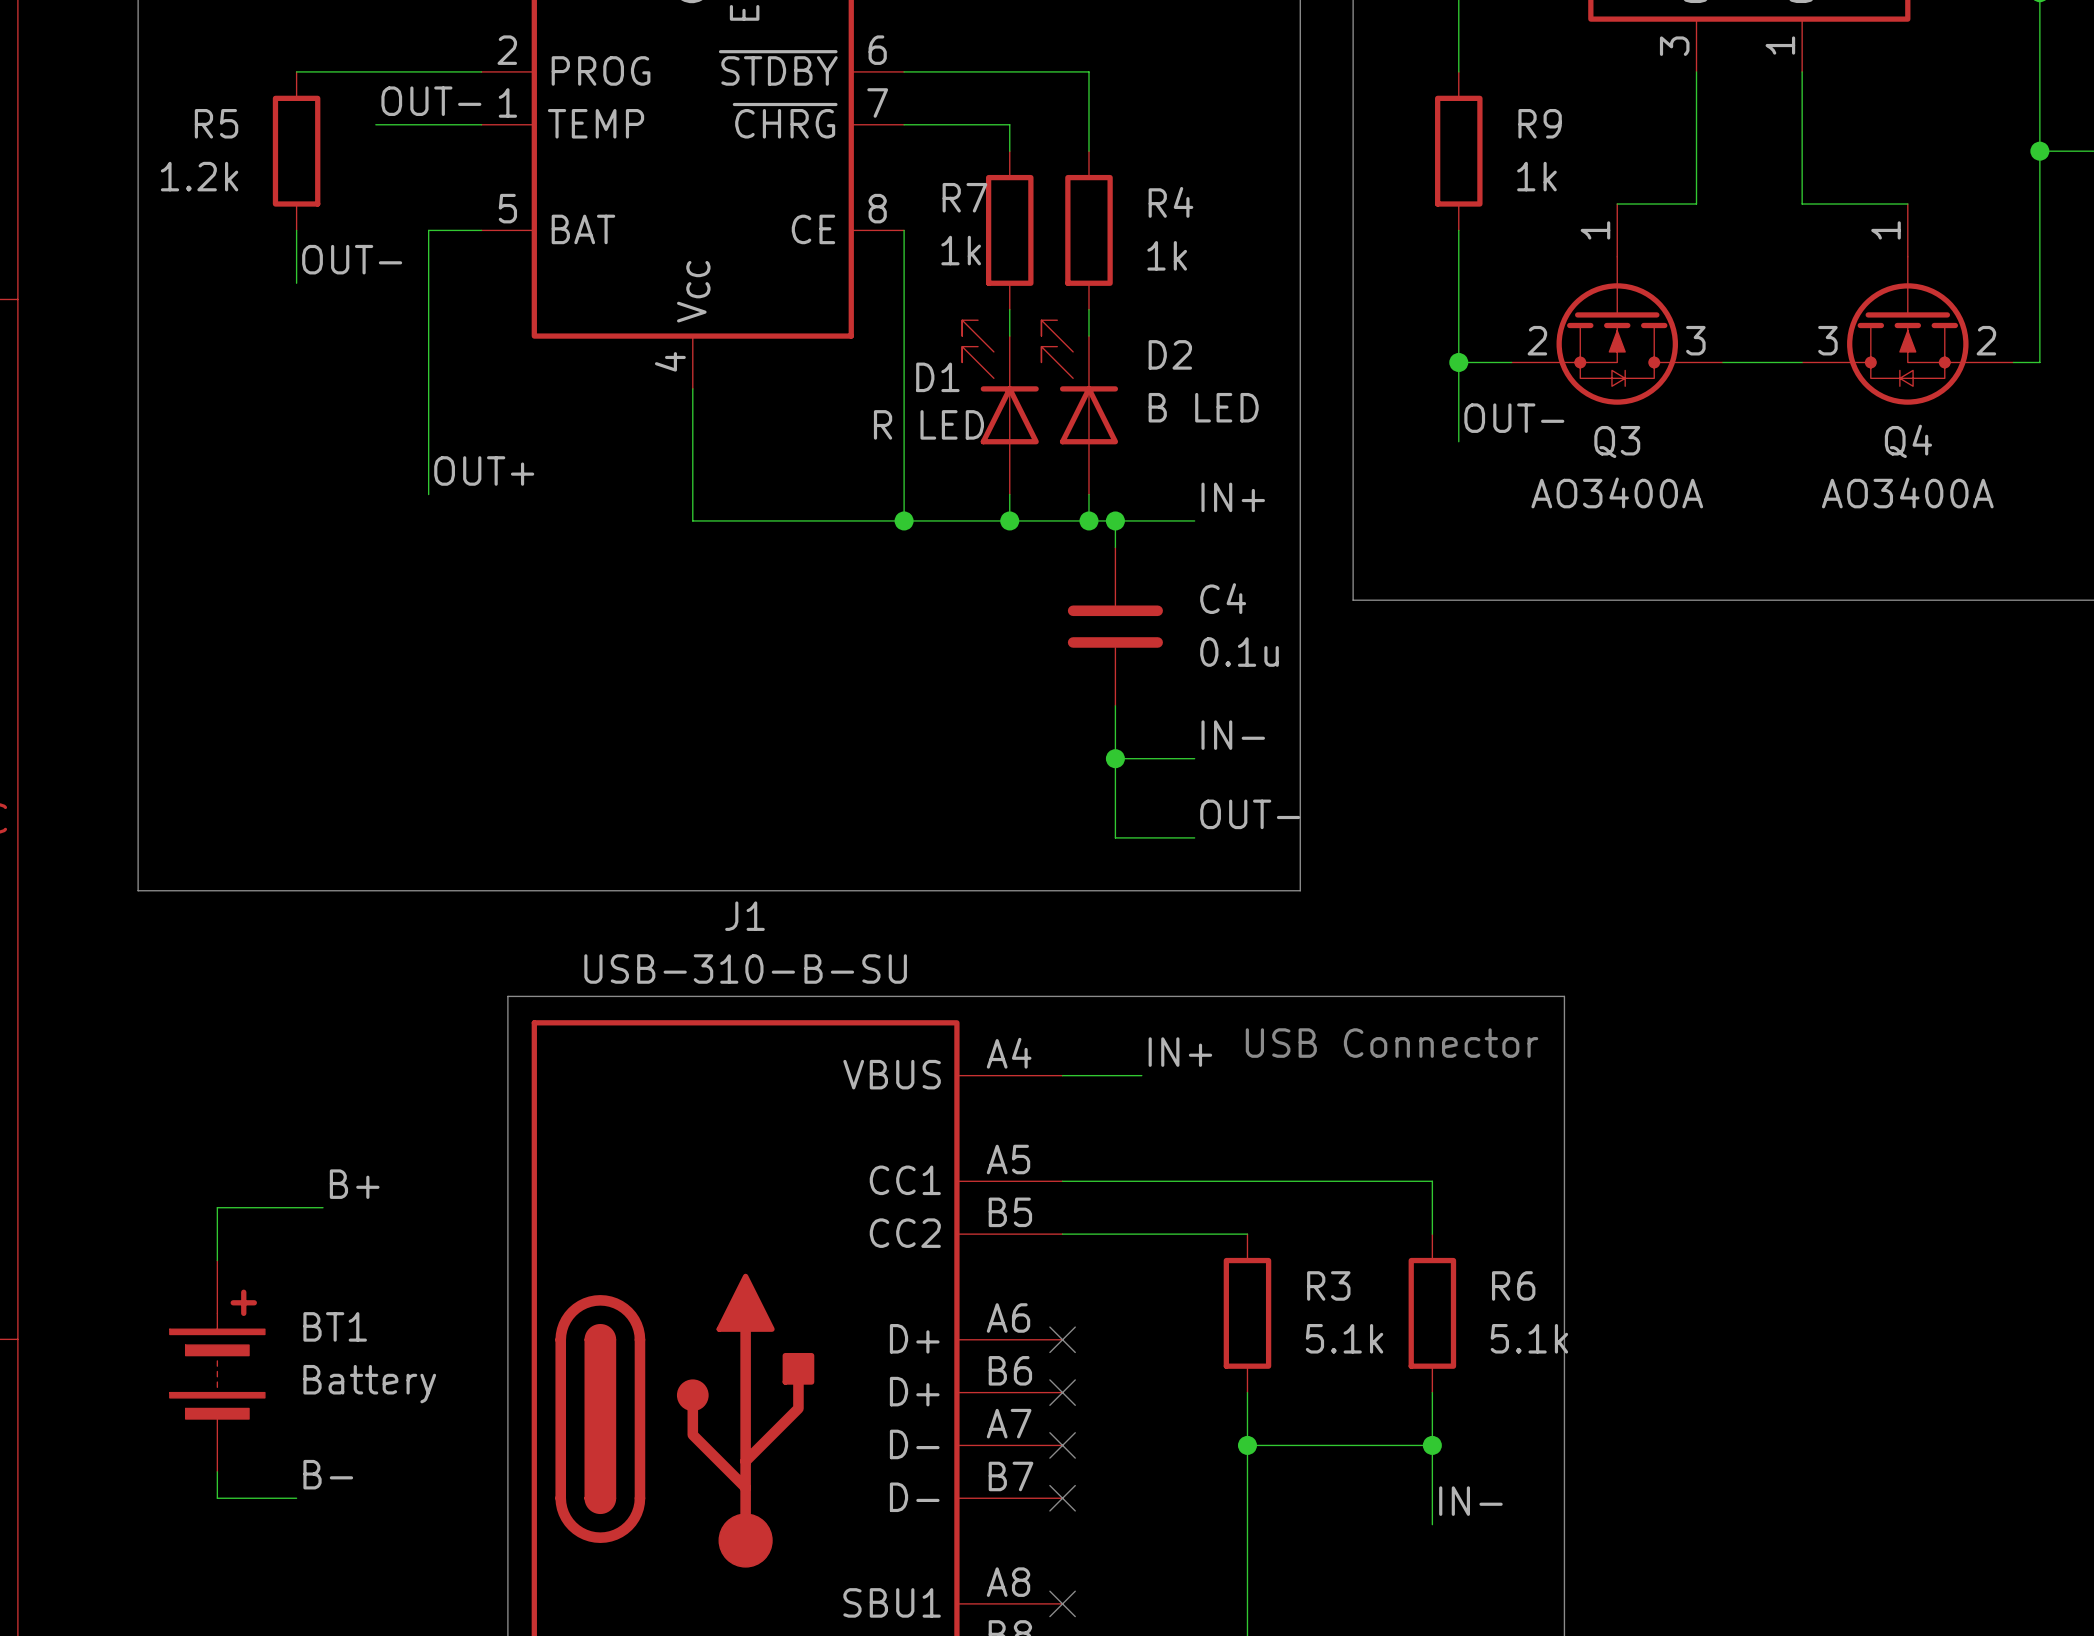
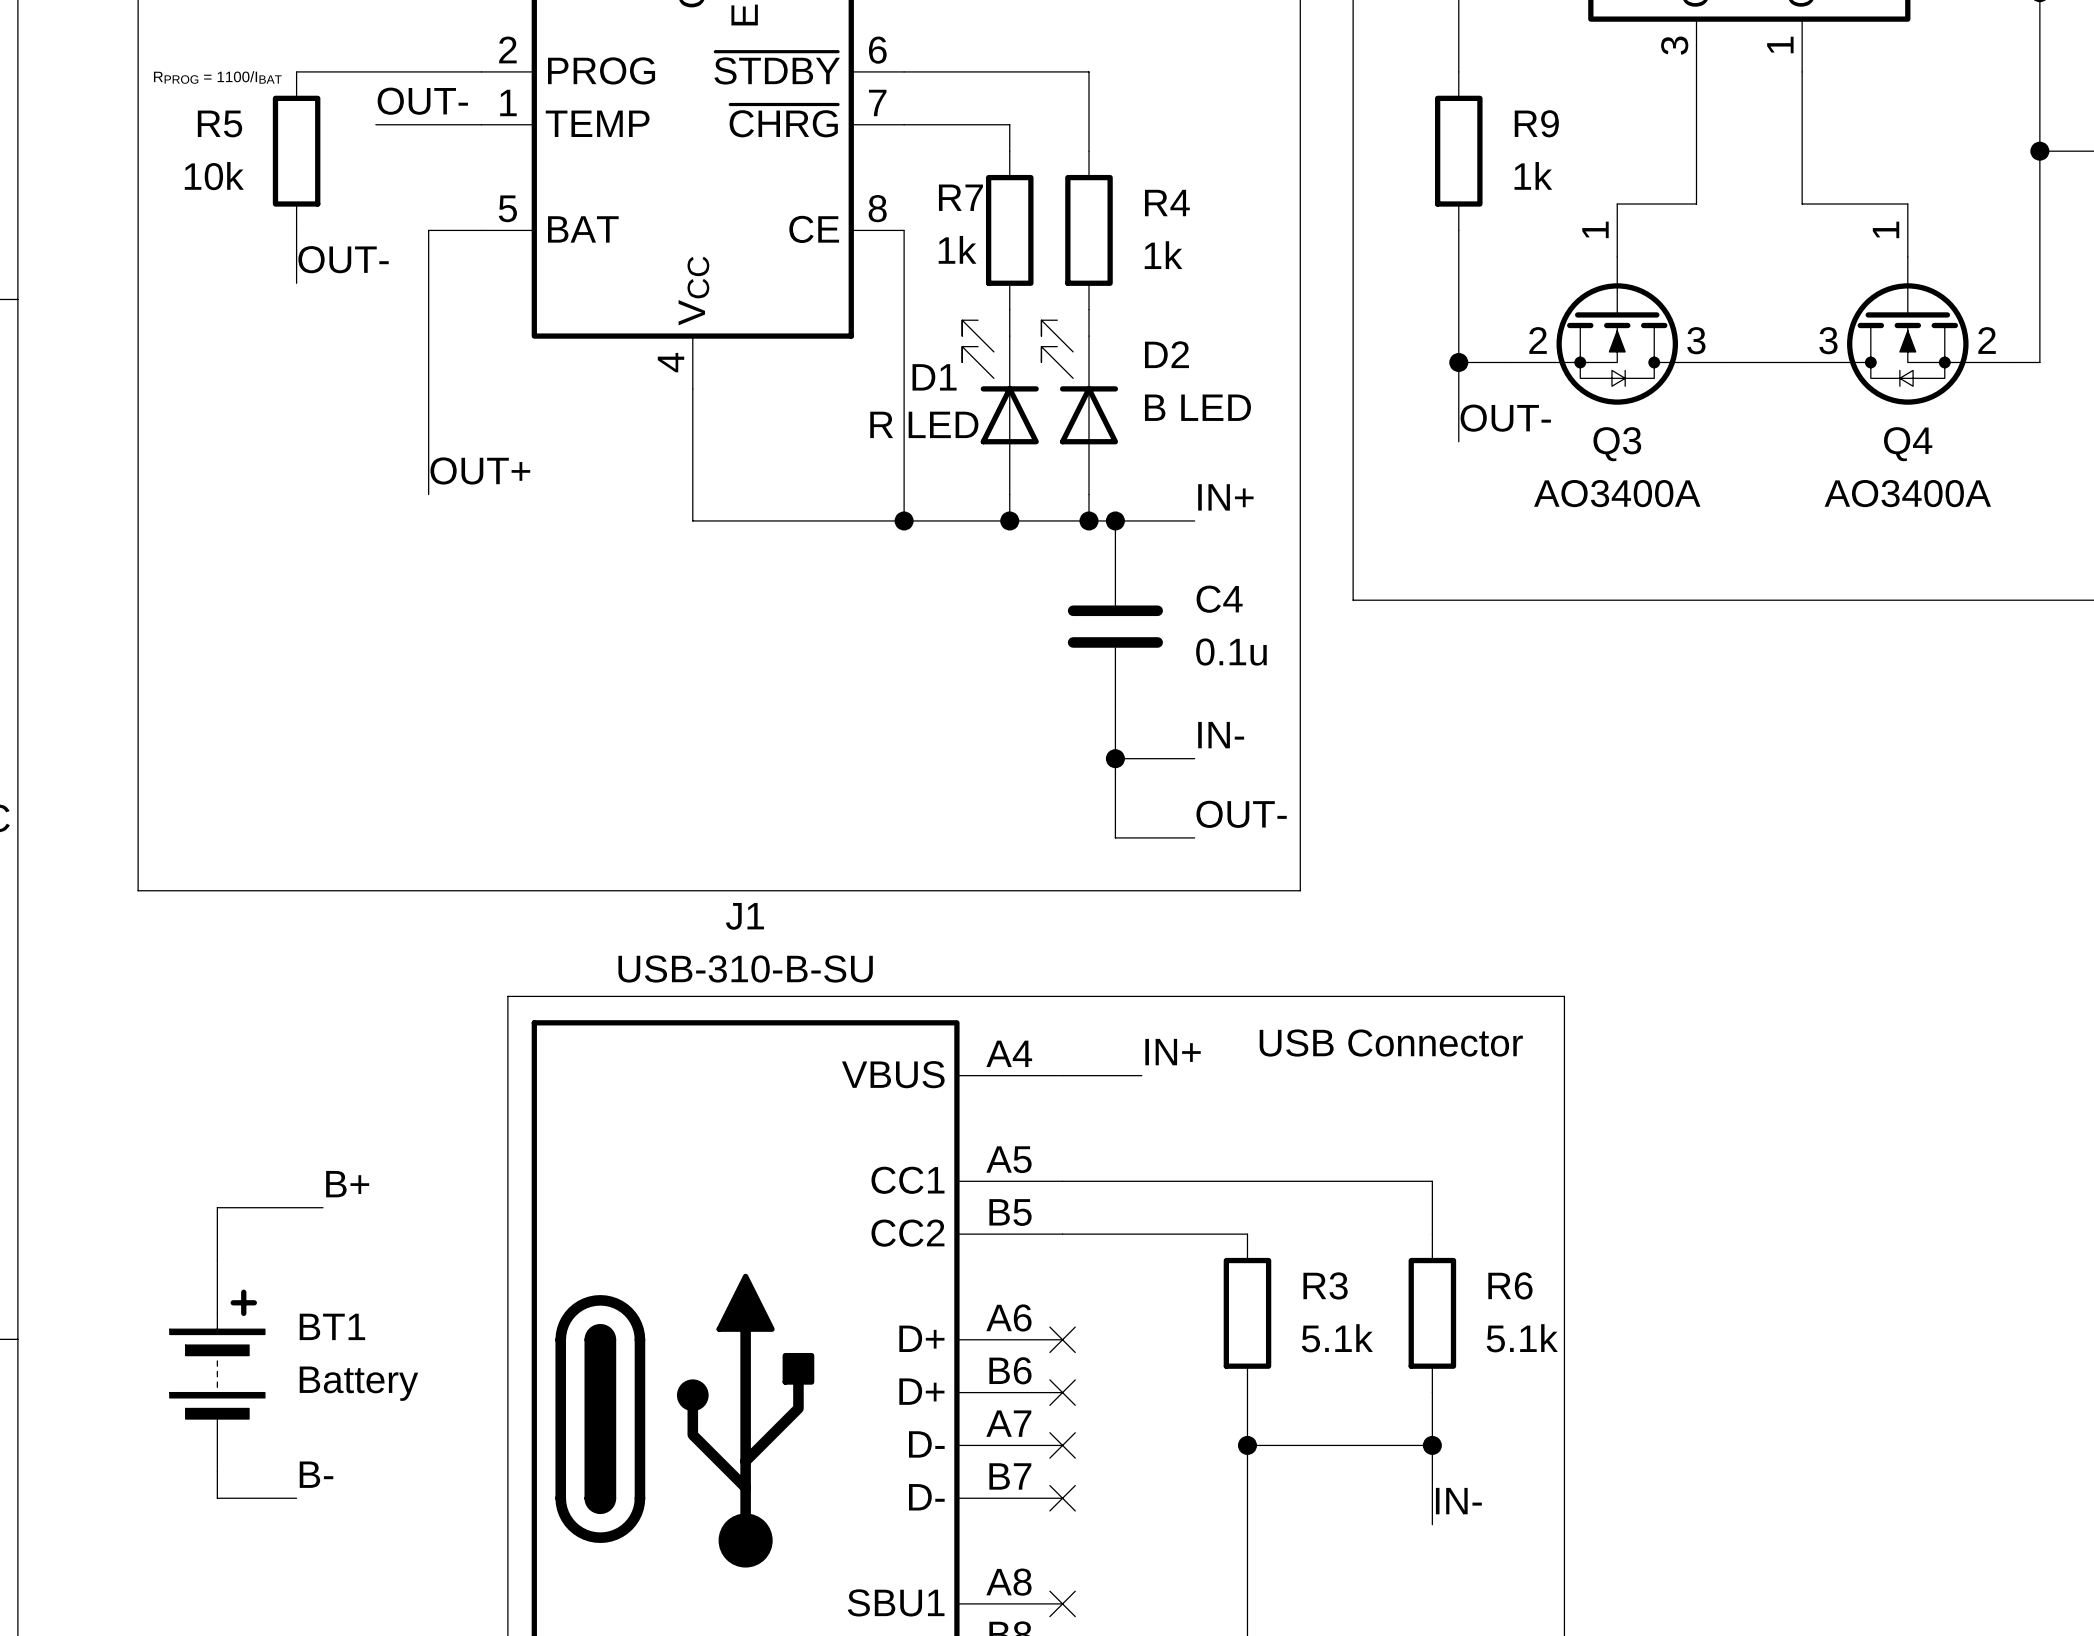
text: none -> RPROG = 1100/IBAT (217, 77)
R5 value: 1.2k (199, 176) -> 10k (214, 176)

